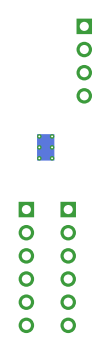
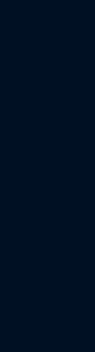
part: (84, 61) -> none
part: (45, 147) -> none
part: (26, 267) -> none
part: (68, 267) -> none

